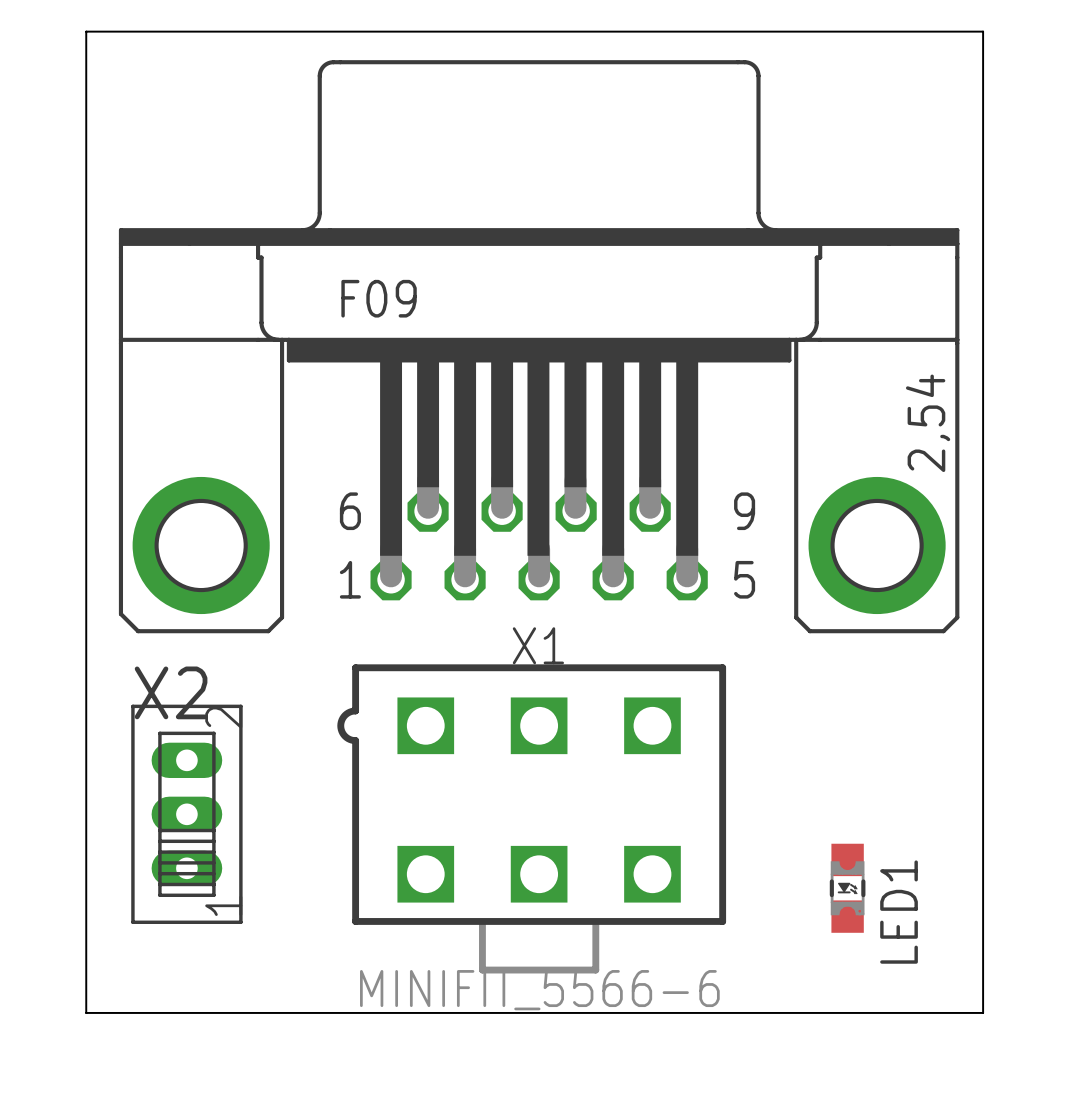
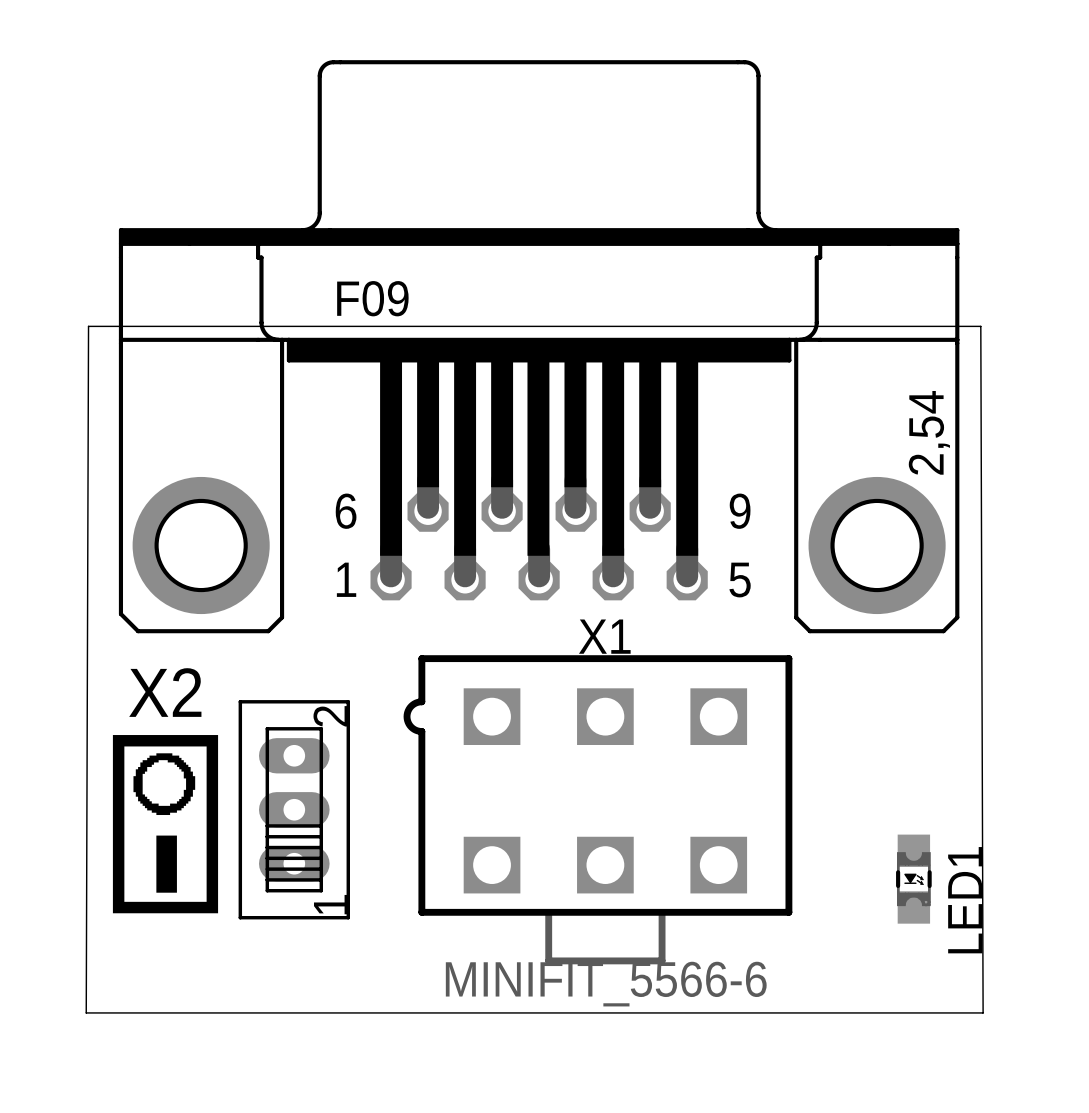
drawing: none -> [112, 735, 219, 914]
part position: (186, 814) -> (294, 809)
X1 position: (531, 818) -> (597, 809)
LED1 position: (847, 888) -> (913, 879)
board edge: (86, 1012) (86, 31) (983, 31) (983, 1012) -> (86, 1012) (88, 326) (980, 326) (983, 1012)

